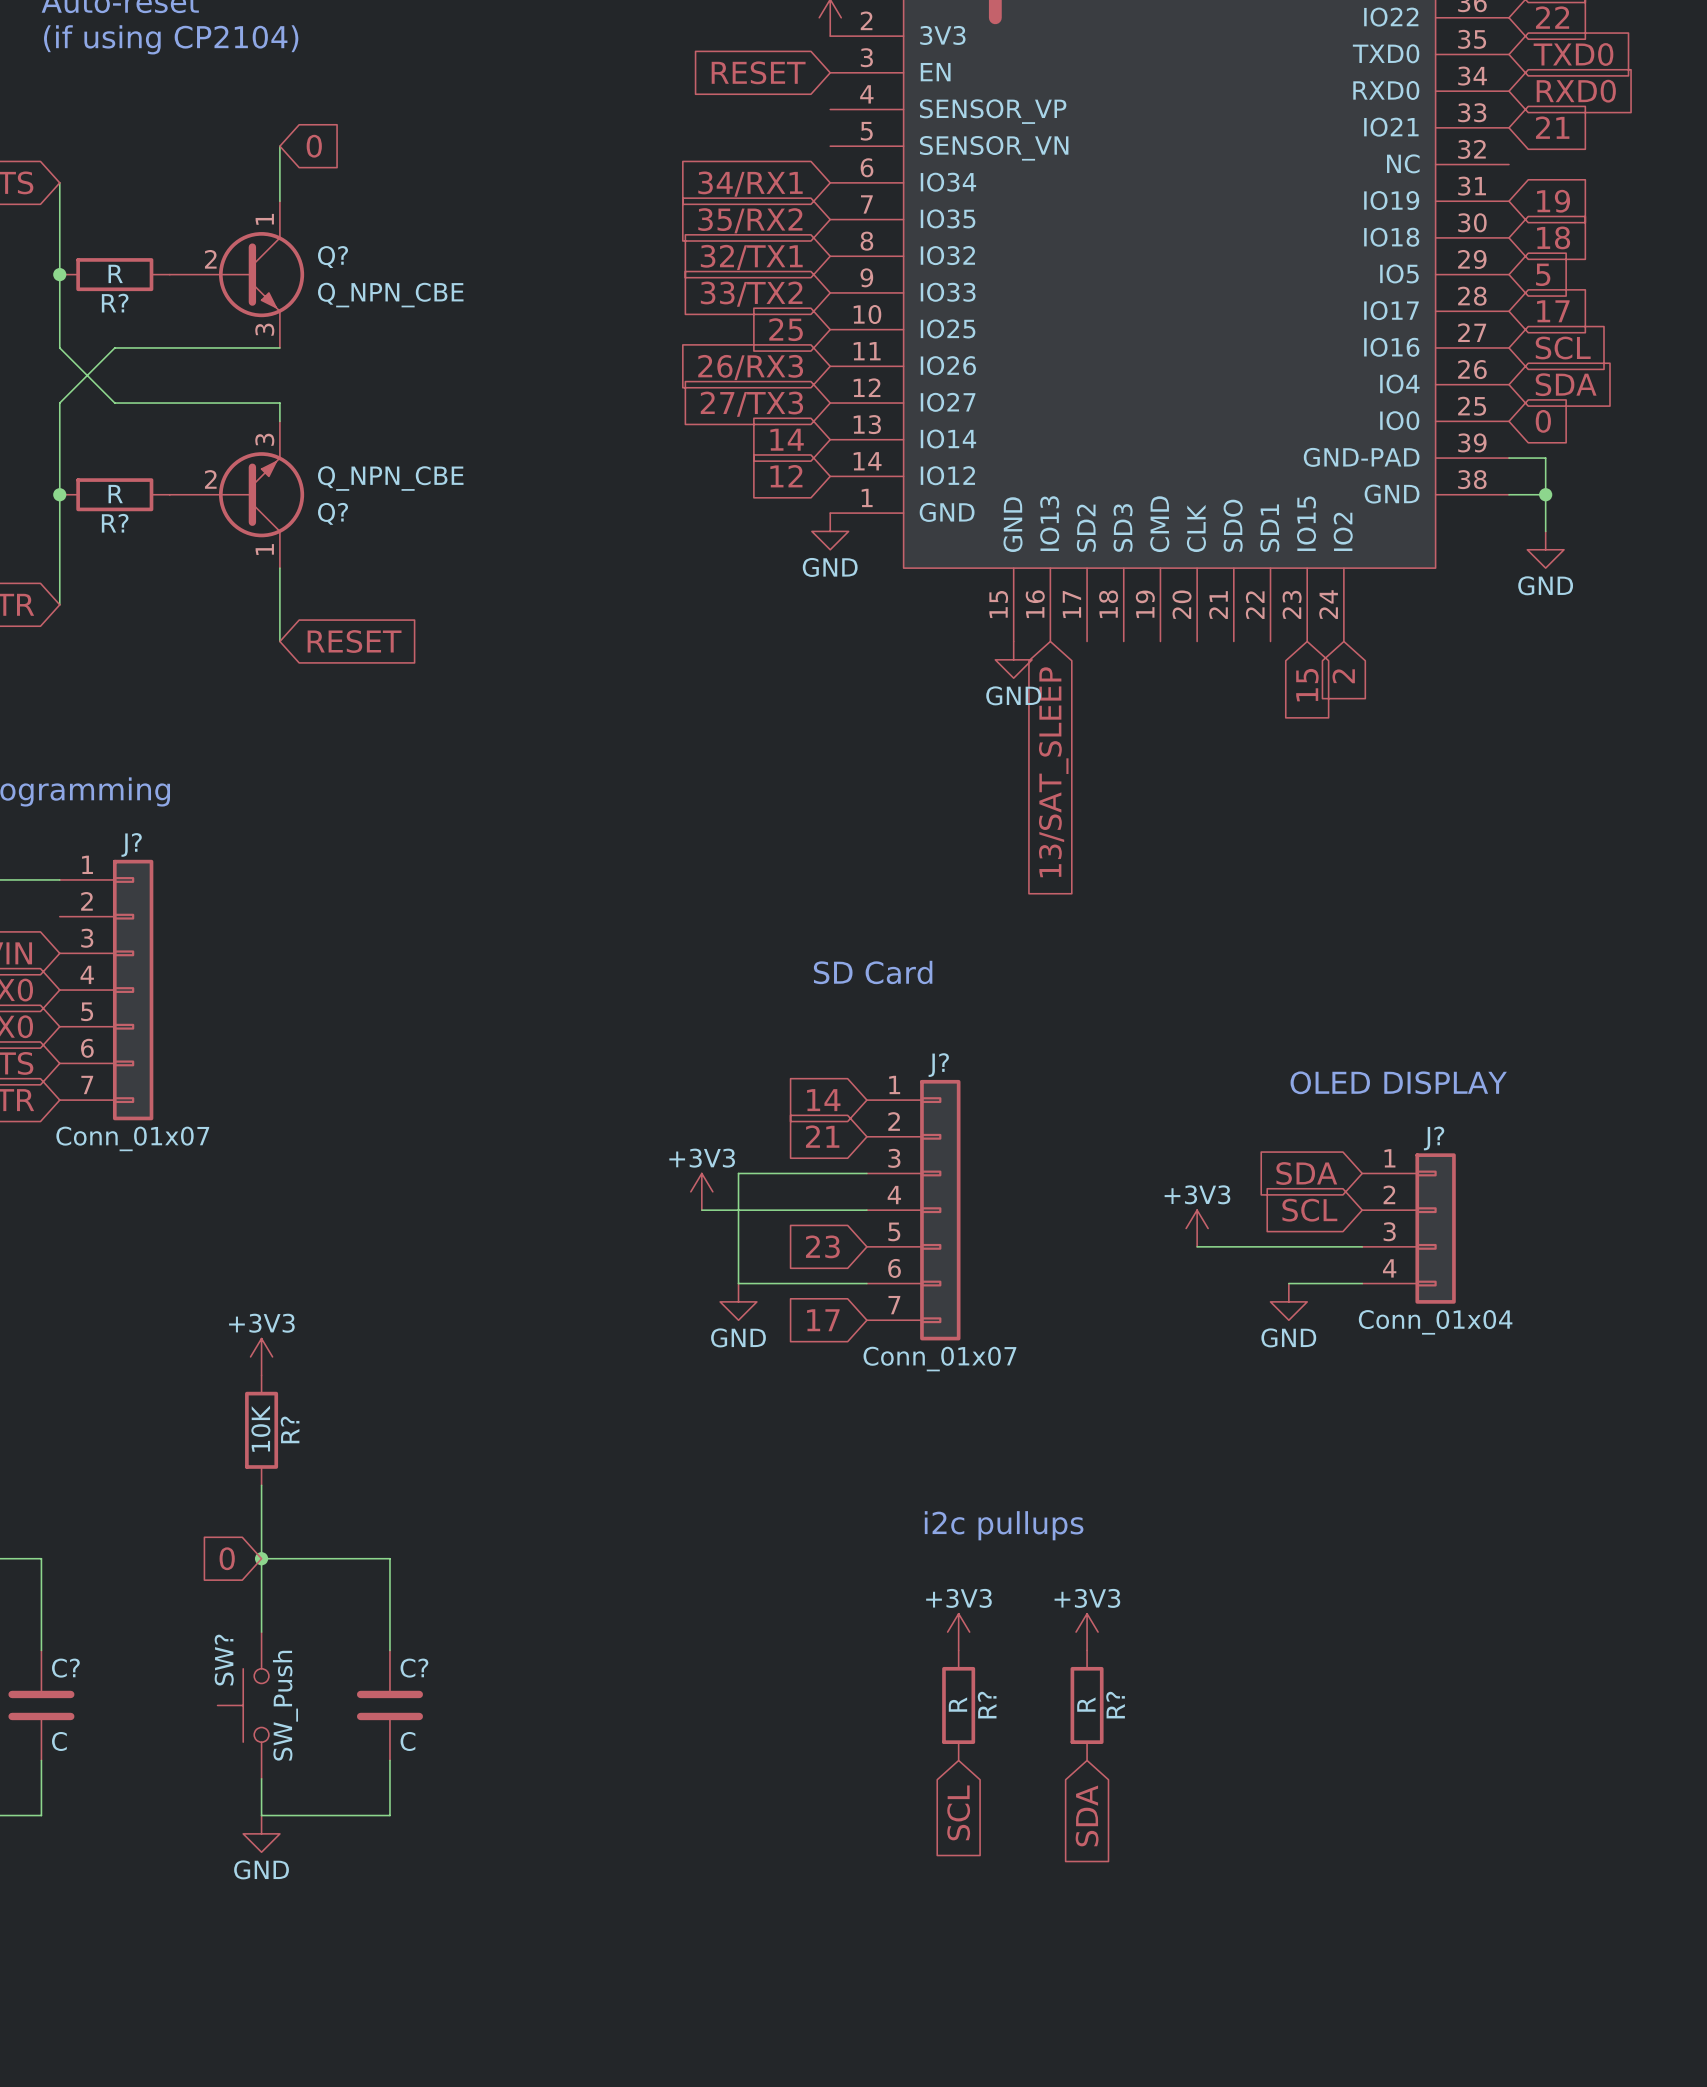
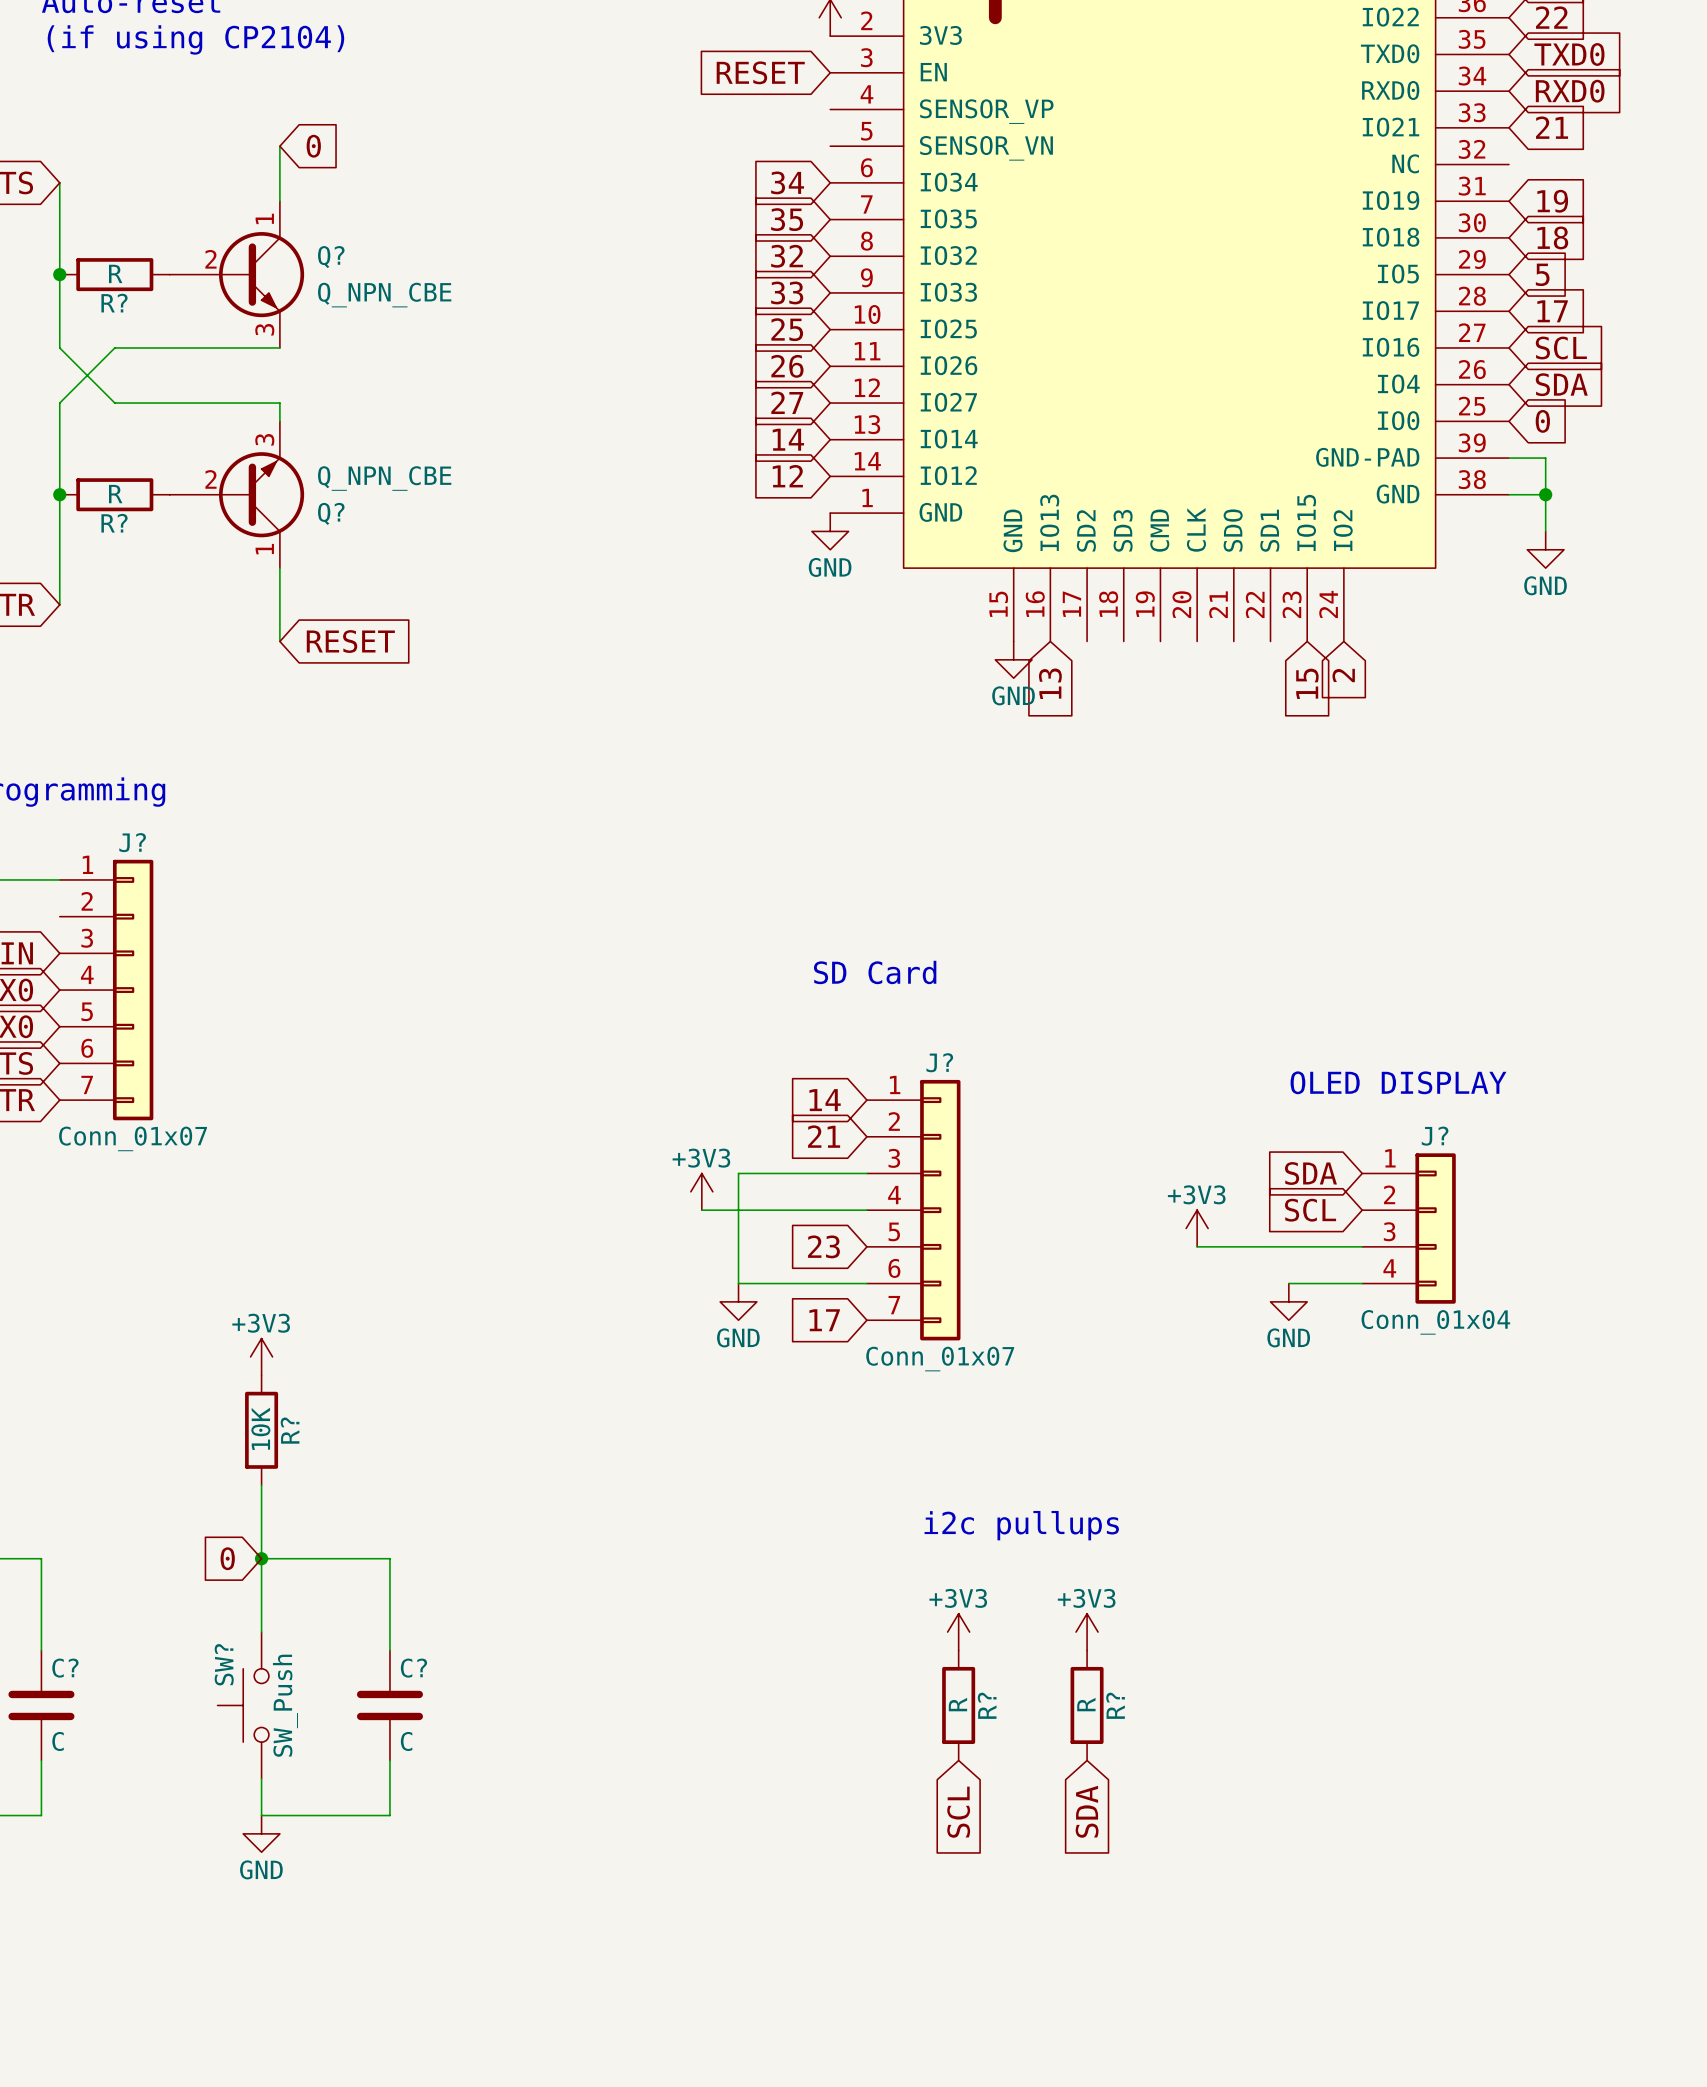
global label: 34/RX1 (750, 184) -> 34 (787, 182)
global label: 35/RX2 (750, 220) -> 35 (787, 219)
global label: 32/TX1 (751, 257) -> 32 (787, 256)
global label: 33/TX2 (751, 294) -> 33 (787, 292)
global label: 26/RX3 (750, 367) -> 26 (787, 366)
global label: 27/TX3 (751, 404) -> 27 (787, 402)
global label: 13/SAT_SLEEP (1053, 772) -> 13 (1050, 683)

